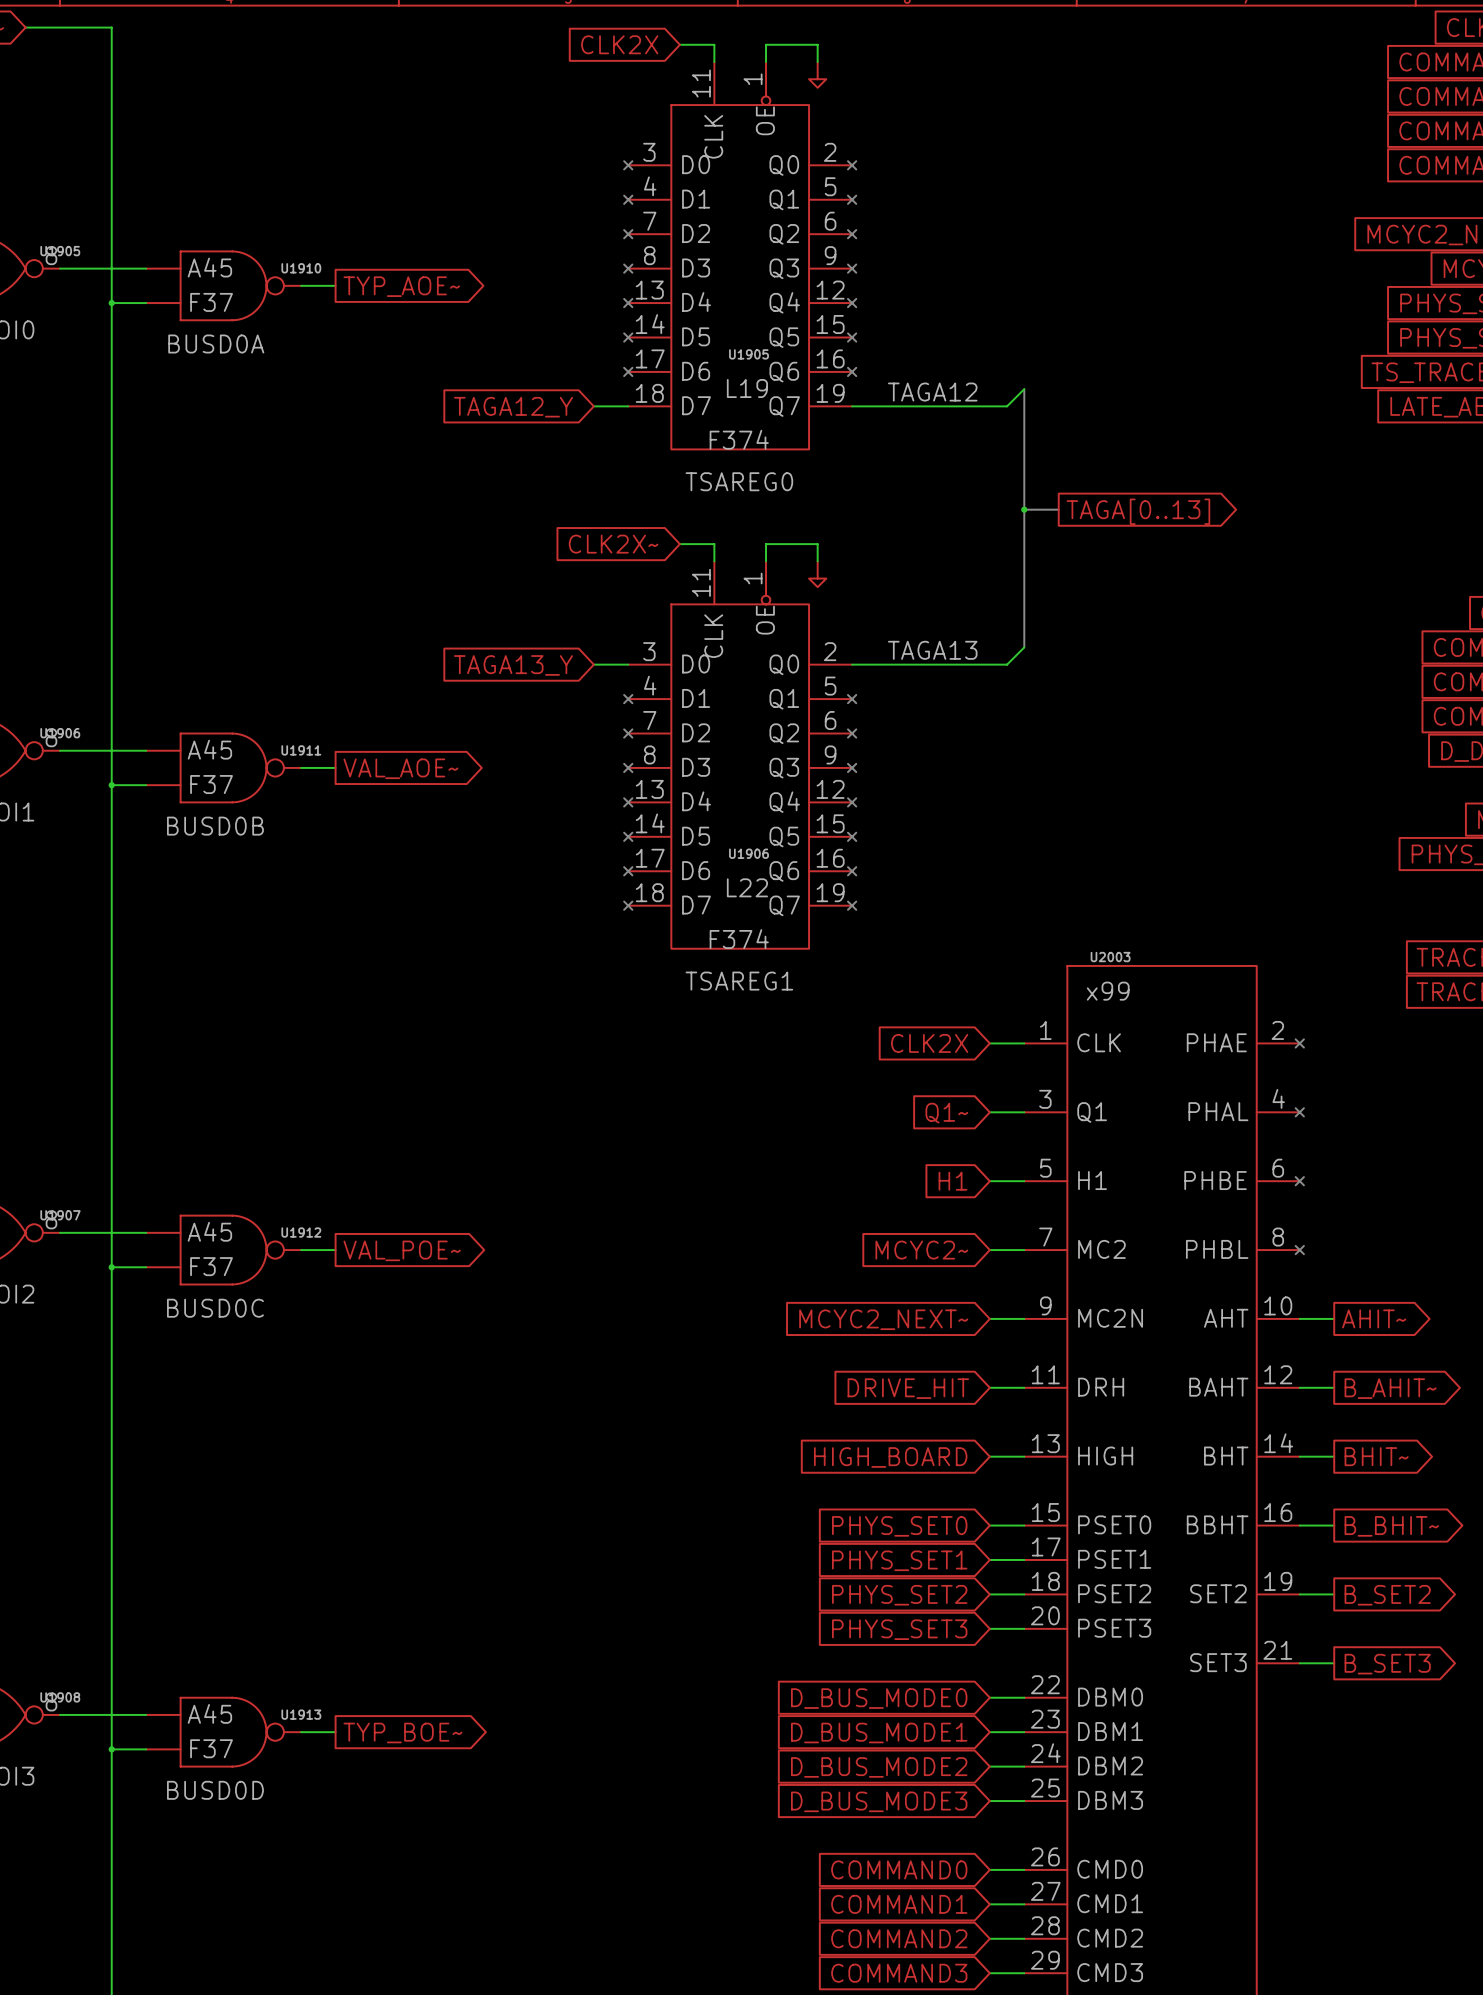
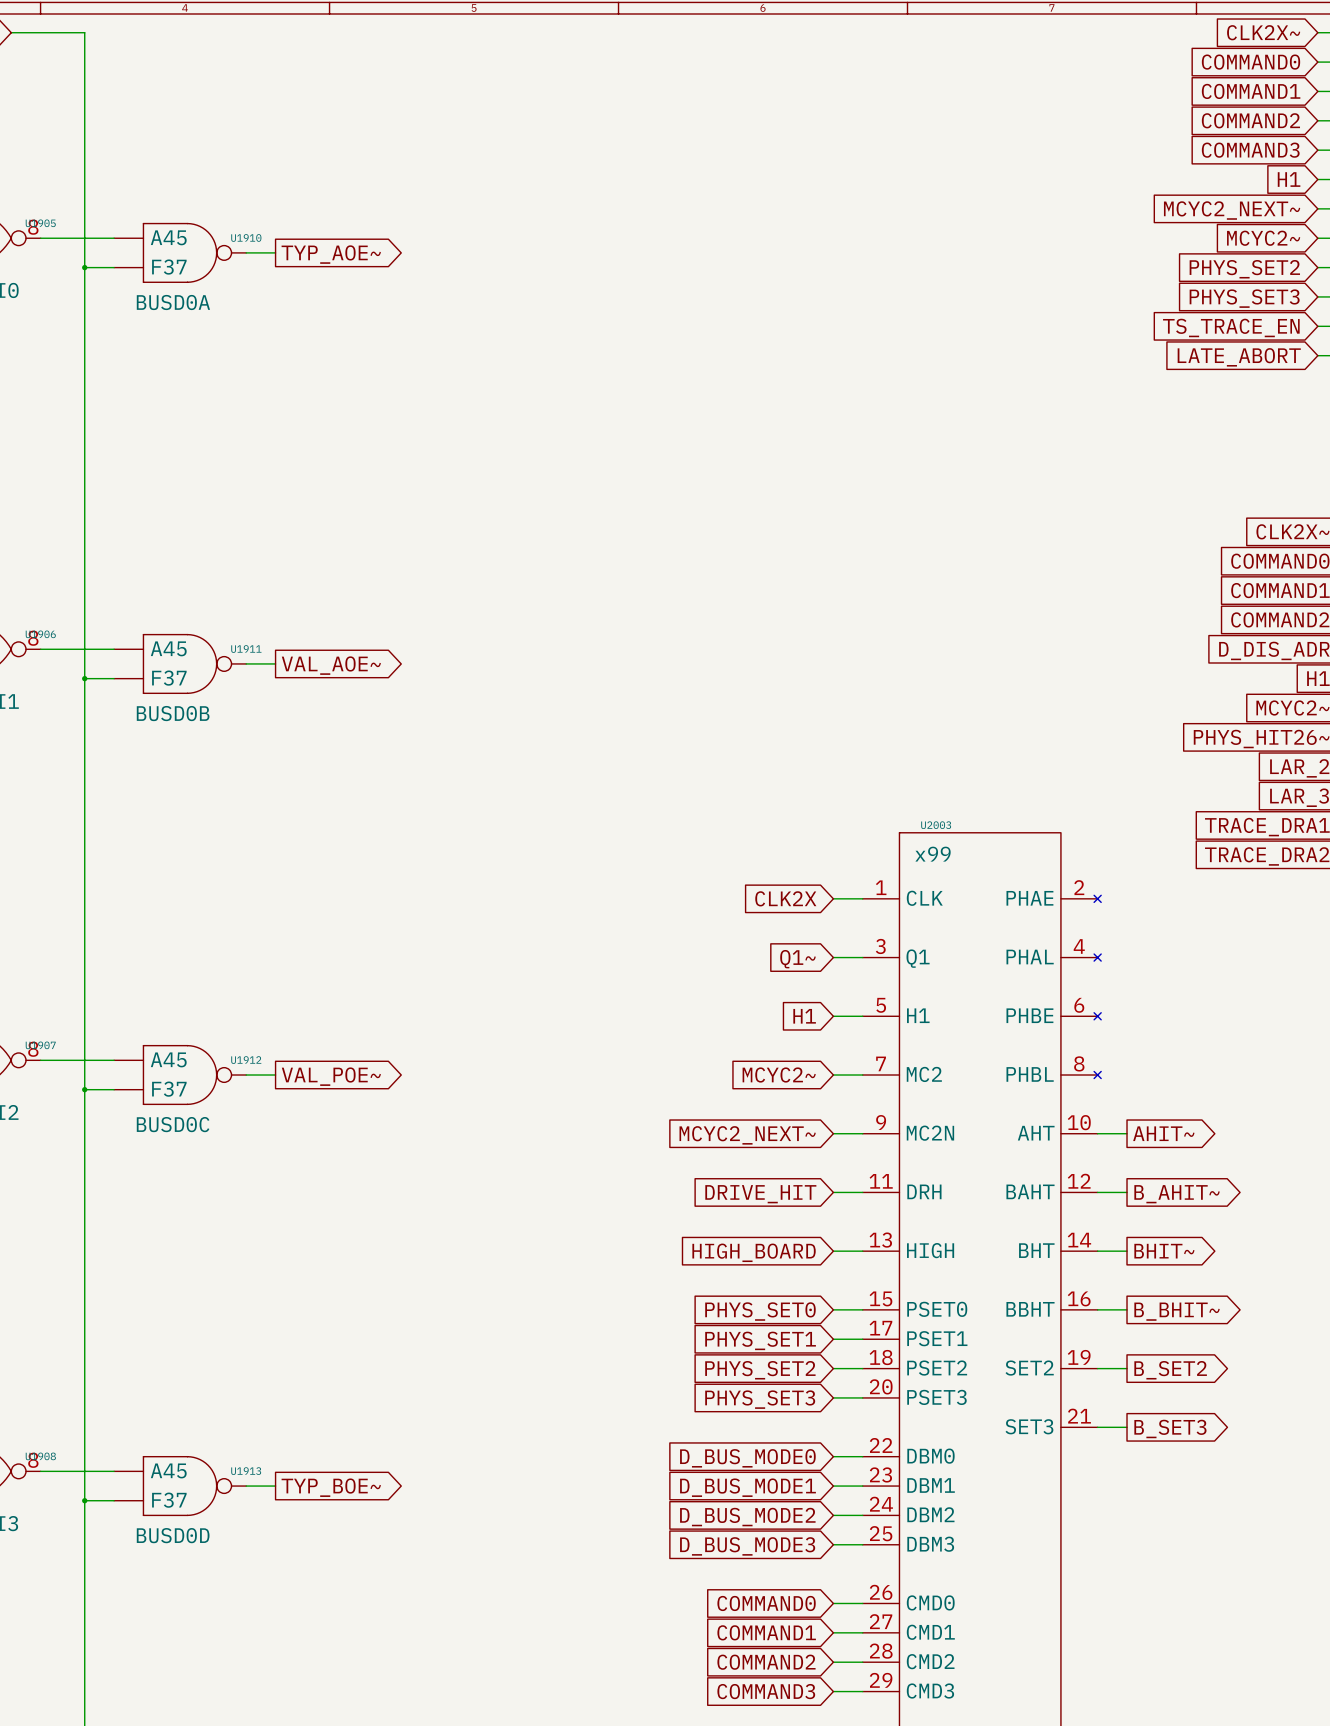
global label: CLK2X (619, 44) -> none
wire: (679, 44) (714, 44) (714, 62) -> none
wire: (766, 62) (766, 44) (817, 44) (817, 62) -> none
power symbol: (817, 75) -> none
no-connect mark: (628, 165) -> none
no-connect mark: (852, 165) -> none
no-connect mark: (628, 199) -> none
no-connect mark: (852, 199) -> none
no-connect mark: (628, 234) -> none
no-connect mark: (852, 234) -> none
U1905: F374 (740, 255) -> none
no-connect mark: (628, 268) -> none
no-connect mark: (852, 268) -> none
no-connect mark: (628, 303) -> none
no-connect mark: (852, 303) -> none
no-connect mark: (628, 337) -> none
no-connect mark: (852, 337) -> none
no-connect mark: (628, 371) -> none
no-connect mark: (852, 371) -> none
wire: (1024, 389) (1007, 406) (852, 406) -> none
bus: (1024, 389) (1024, 647) -> none
label: TAGA12 (932, 392) -> none
wire: (593, 406) (628, 406) -> none
global label: TAGA12_Y (513, 407) -> none
bus: (1024, 509) (1058, 509) -> none
junction: (1024, 509) -> none
global label: TAGA[0..13] (1138, 511) -> none
global label: CLK2X~ (613, 544) -> none
wire: (679, 544) (714, 544) (714, 561) -> none
wire: (766, 561) (766, 544) (817, 544) (817, 561) -> none
power symbol: (817, 574) -> none
wire: (1024, 647) (1007, 664) (852, 664) -> none
label: TAGA13 (932, 650) -> none
wire: (593, 664) (628, 664) -> none
global label: TAGA13_Y (513, 665) -> none
no-connect mark: (628, 699) -> none
no-connect mark: (852, 699) -> none
no-connect mark: (628, 733) -> none
no-connect mark: (852, 733) -> none
U1906: F374 (740, 755) -> none
no-connect mark: (628, 767) -> none
no-connect mark: (852, 767) -> none
no-connect mark: (628, 802) -> none
no-connect mark: (852, 802) -> none
no-connect mark: (628, 836) -> none
no-connect mark: (852, 836) -> none
no-connect mark: (628, 871) -> none
no-connect mark: (852, 871) -> none
no-connect mark: (628, 905) -> none
no-connect mark: (852, 905) -> none

